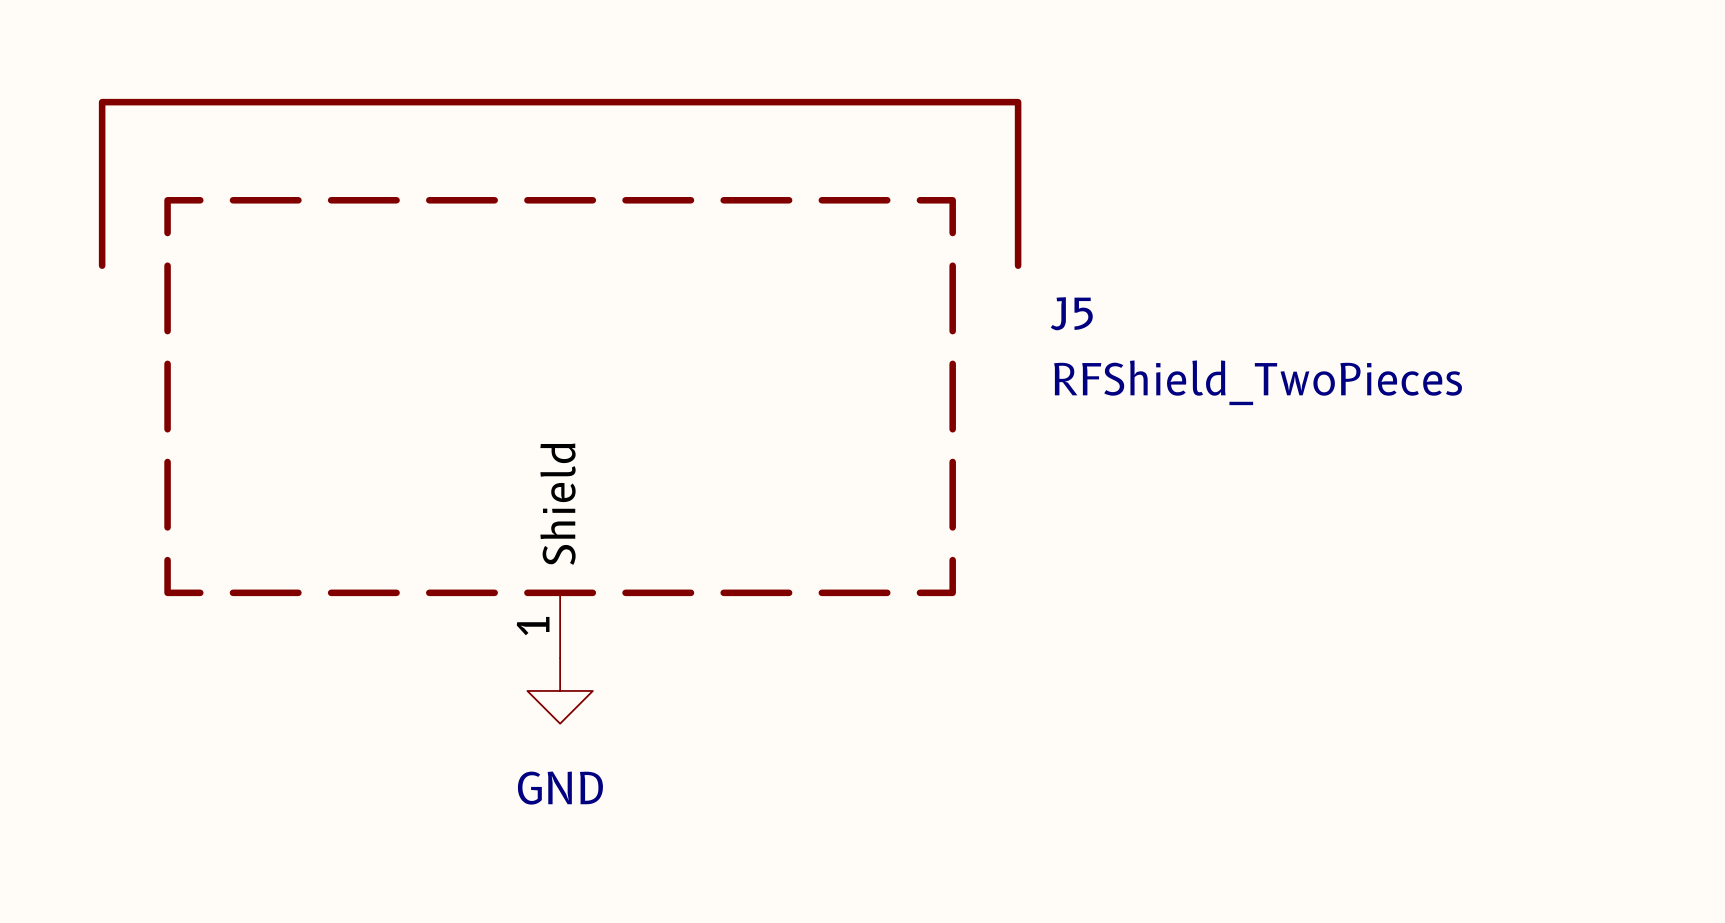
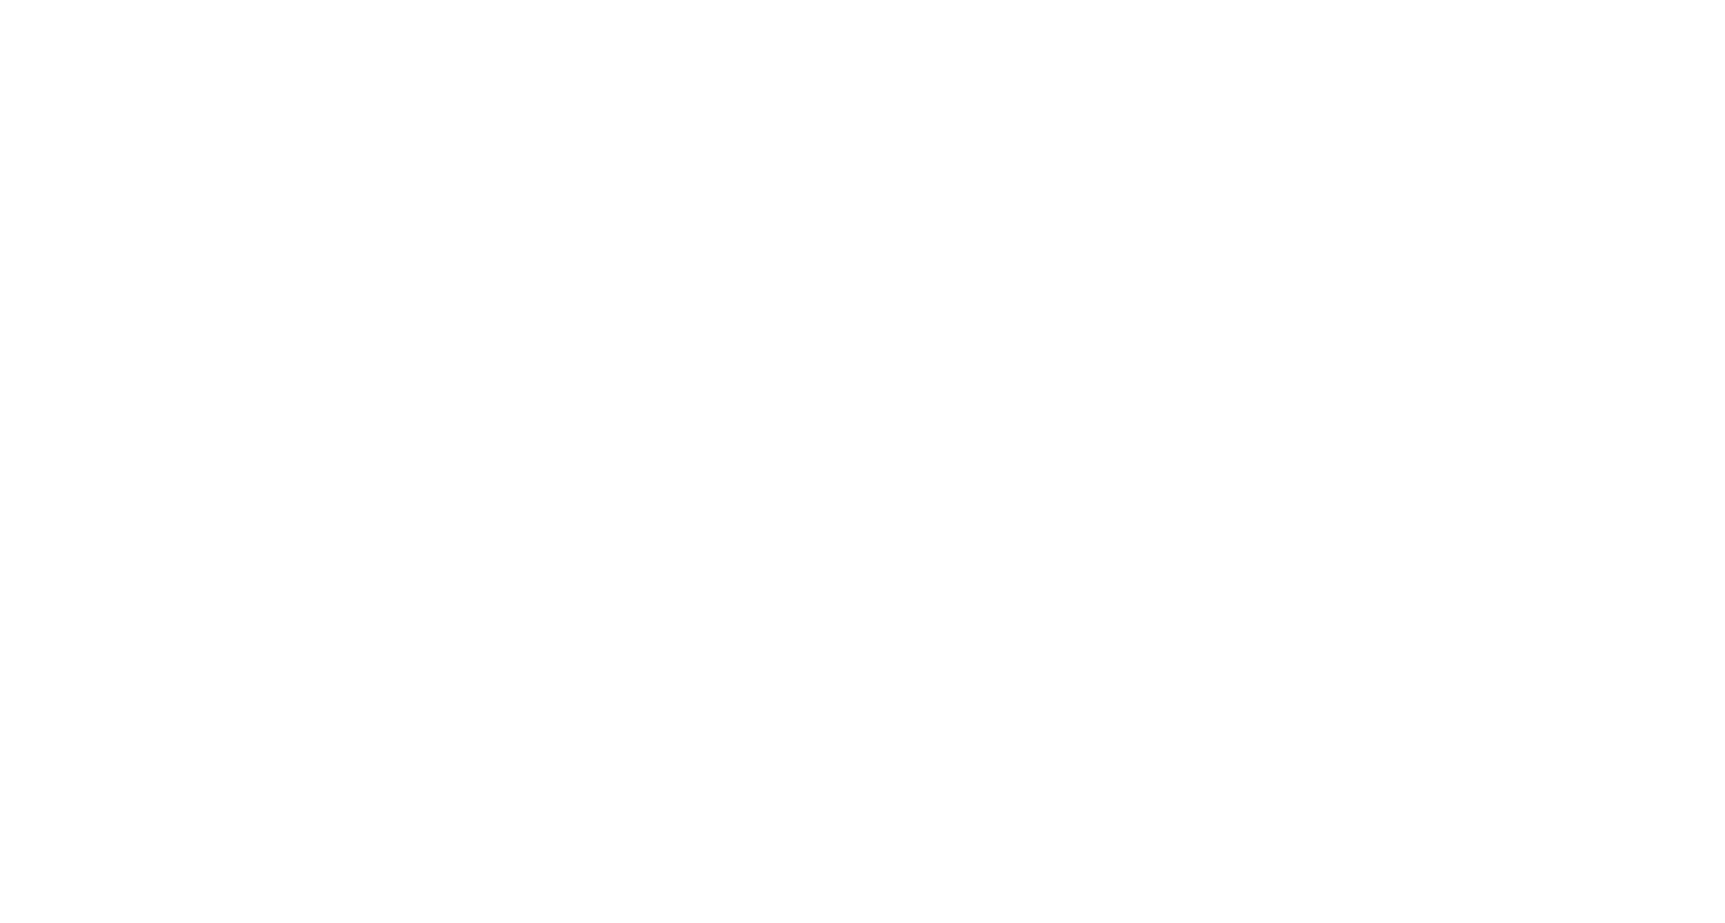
J5: RFShield_TwoPieces (560, 378) -> none
power symbol: GND (560, 690) -> none

